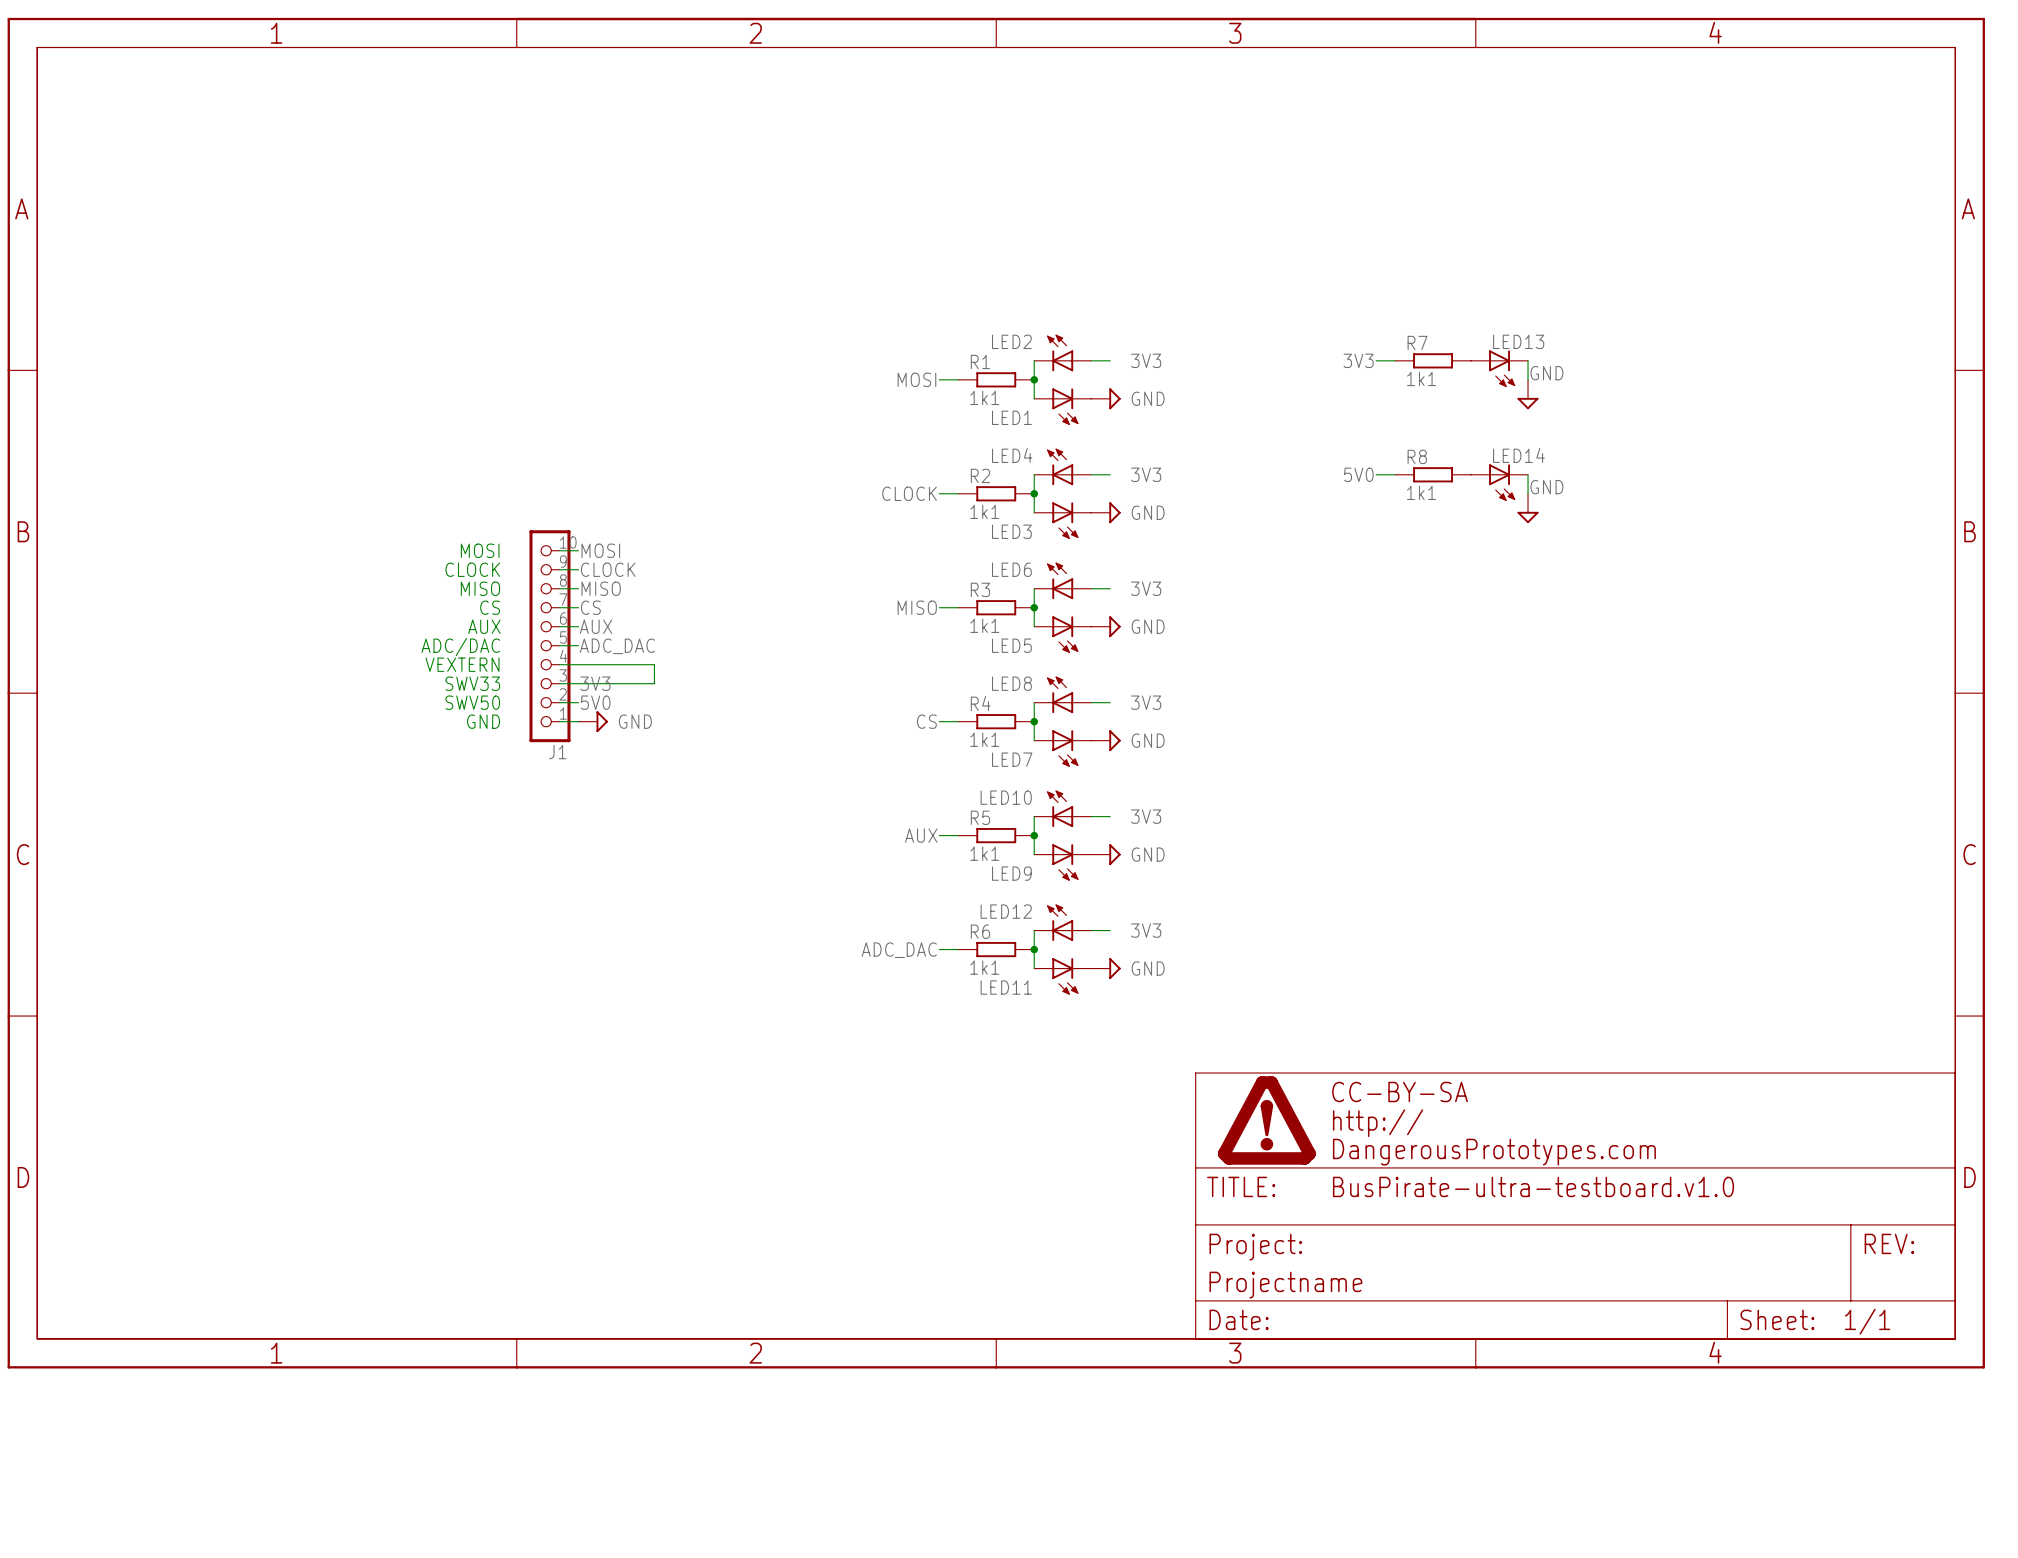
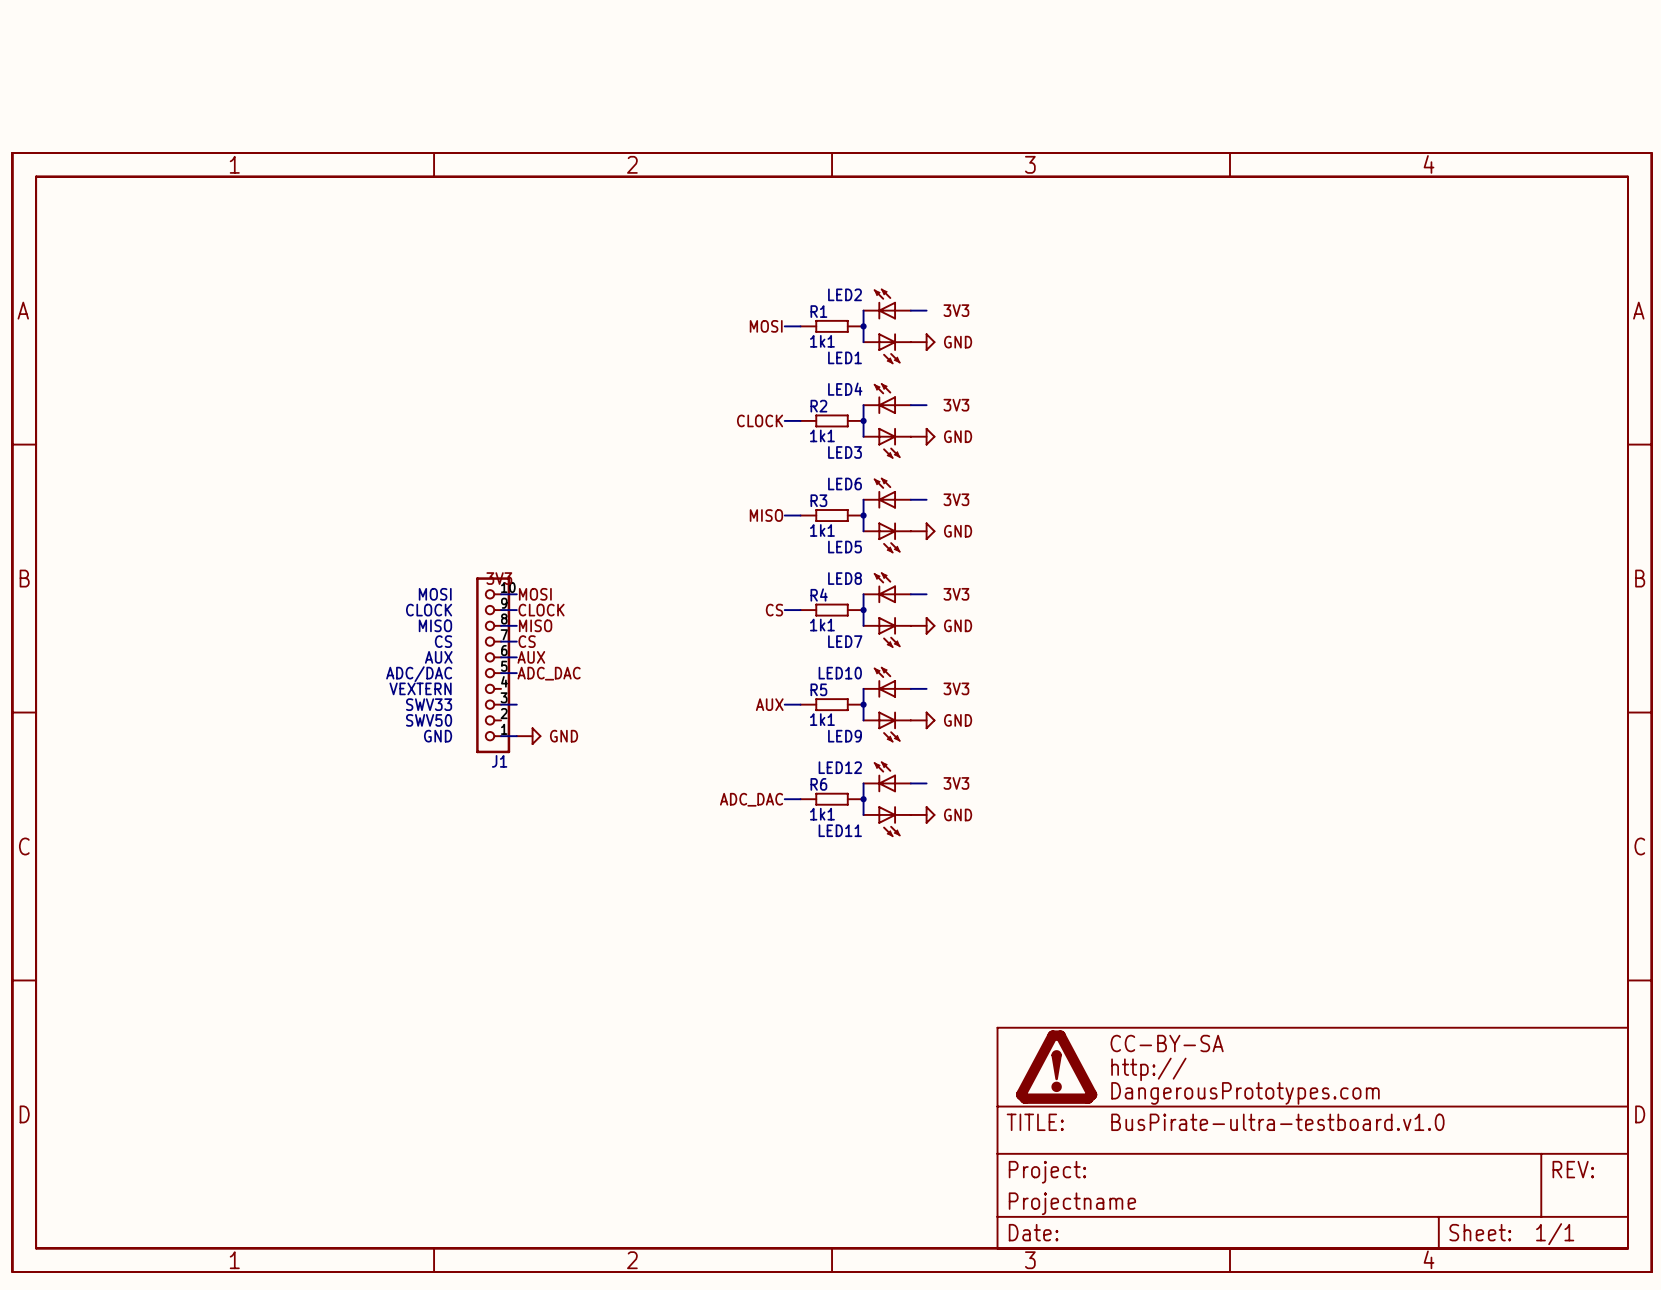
label: 3V3 (1358, 360) -> none
wire: (1376, 360) (1395, 360) -> none
R7: 1k1 (1433, 360) -> none
wire: (1528, 360) (1528, 379) -> none
LED13: (1499, 368) -> none
label: GND (1546, 373) -> none
power symbol: (1528, 394) -> none
label: 5V0 (1358, 474) -> none
wire: (1376, 474) (1395, 474) -> none
R8: 1k1 (1433, 474) -> none
wire: (1528, 474) (1528, 493) -> none
LED14: (1499, 482) -> none
label: GND (1546, 487) -> none
power symbol: (1528, 508) -> none
text position: MOSI (480, 550) -> MOSI (435, 594)
wire: (559, 550) (578, 550) -> (501, 594) (516, 594)
label position: MOSI (600, 550) -> MOSI (535, 594)
text position: CLOCK (472, 569) -> CLOCK (429, 610)
wire: (559, 569) (578, 569) -> (501, 610) (516, 610)
label: CLOCK (608, 569) -> none
text position: MISO (480, 588) -> MISO (435, 625)
wire: (559, 588) (578, 588) -> (501, 625) (516, 625)
label position: MISO (601, 588) -> MISO (535, 625)
text position: CS (490, 607) -> CS (443, 641)
wire: (559, 607) (578, 607) -> (501, 641) (516, 641)
label position: CS (590, 607) -> CS (527, 641)
text position: AUX (484, 626) -> AUX (438, 657)
wire: (559, 626) (578, 626) -> (501, 657) (516, 657)
label position: AUX (595, 626) -> AUX (531, 657)
J1 position: (549, 636) -> (493, 665)
wire: (559, 645) (578, 645) -> (501, 673) (516, 673)
text position: ADC/DAC (460, 646) -> ADC/DAC (419, 674)
label position: ADC_DAC (617, 646) -> ADC_DAC (549, 673)
text position: VEXTERN (462, 664) -> VEXTERN (420, 688)
wire: (559, 664) (654, 664) (654, 683) (559, 683) -> none
text position: SWV33 (472, 683) -> SWV33 (429, 704)
part position: (996, 693) -> (832, 712)
text position: SWV50 (472, 702) -> SWV50 (429, 720)
wire: (559, 702) (578, 702) -> (501, 704) (516, 704)
label: 5V0 (595, 702) -> none
text position: GND (483, 721) -> GND (438, 736)
wire: (559, 721) (578, 721) -> (501, 736) (516, 736)
power symbol position: (593, 721) -> (529, 736)
label: GND (635, 721) -> CLOCK (541, 610)
label: none -> GND (564, 736)
part position: (1575, 1205) -> (1312, 1138)

